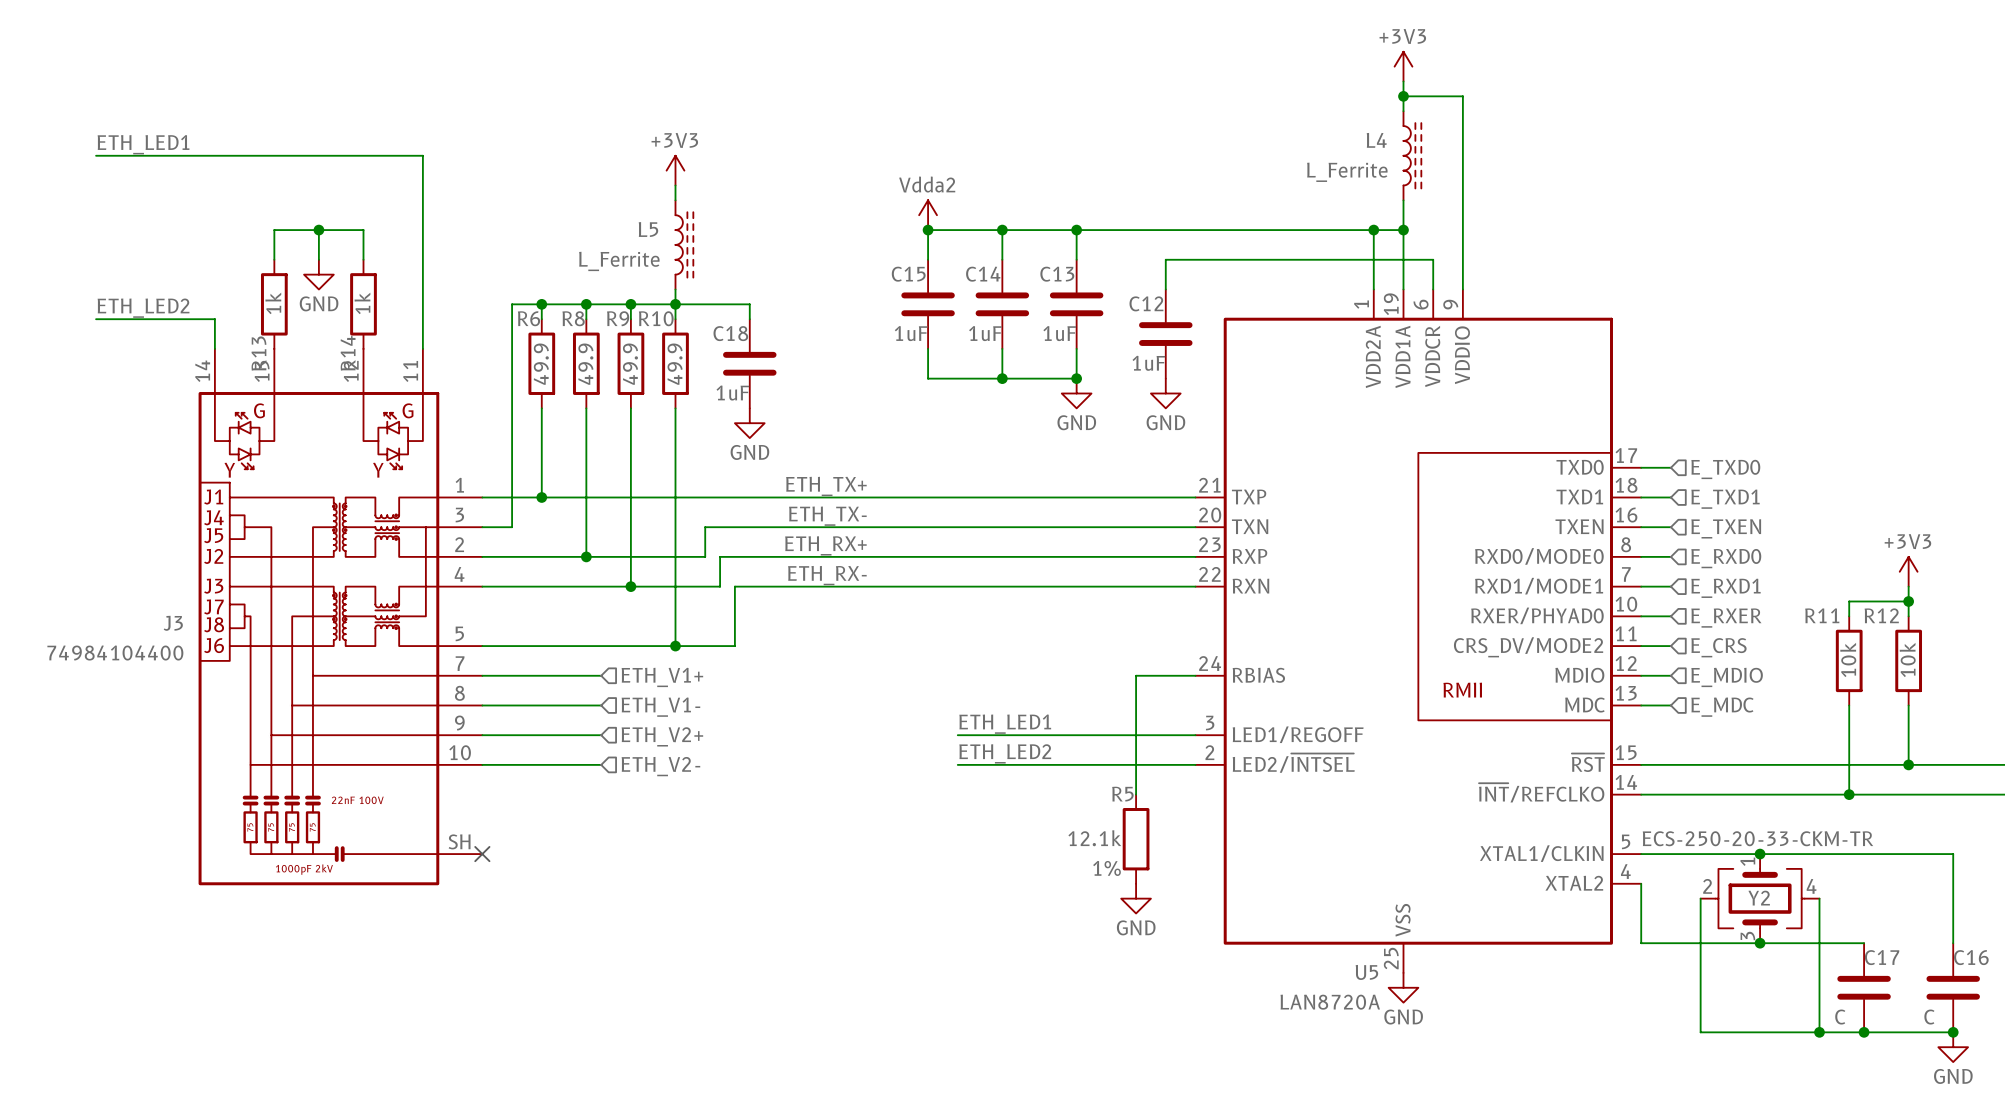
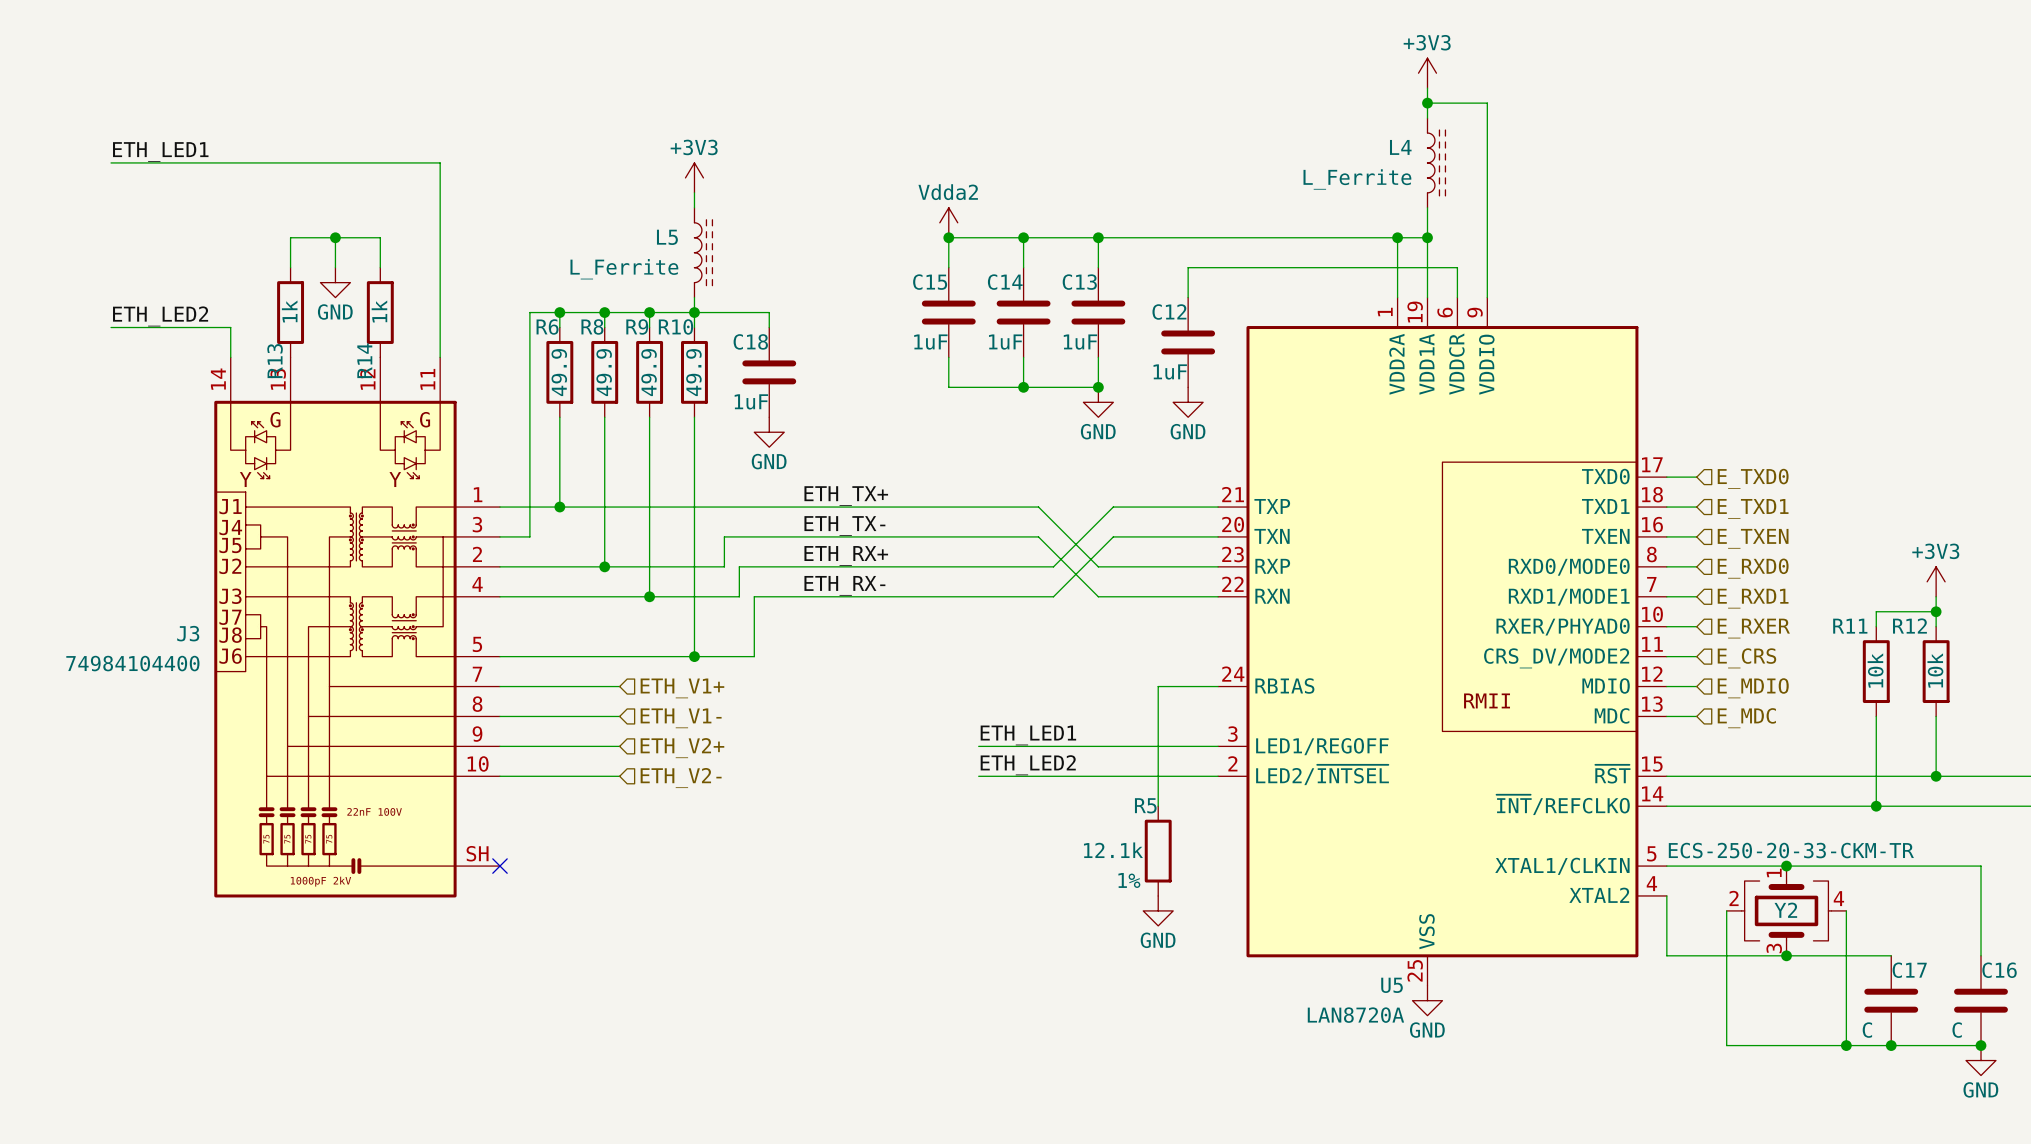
wire: (1017, 497) (1091, 497) -> (1053, 566) (1113, 507)
wire: (1017, 527) (1091, 527) -> (1053, 596) (1113, 536)
wire: (1032, 556) (1076, 556) -> (1038, 507) (1098, 566)
wire: (1032, 586) (1076, 586) -> (1038, 536) (1098, 596)

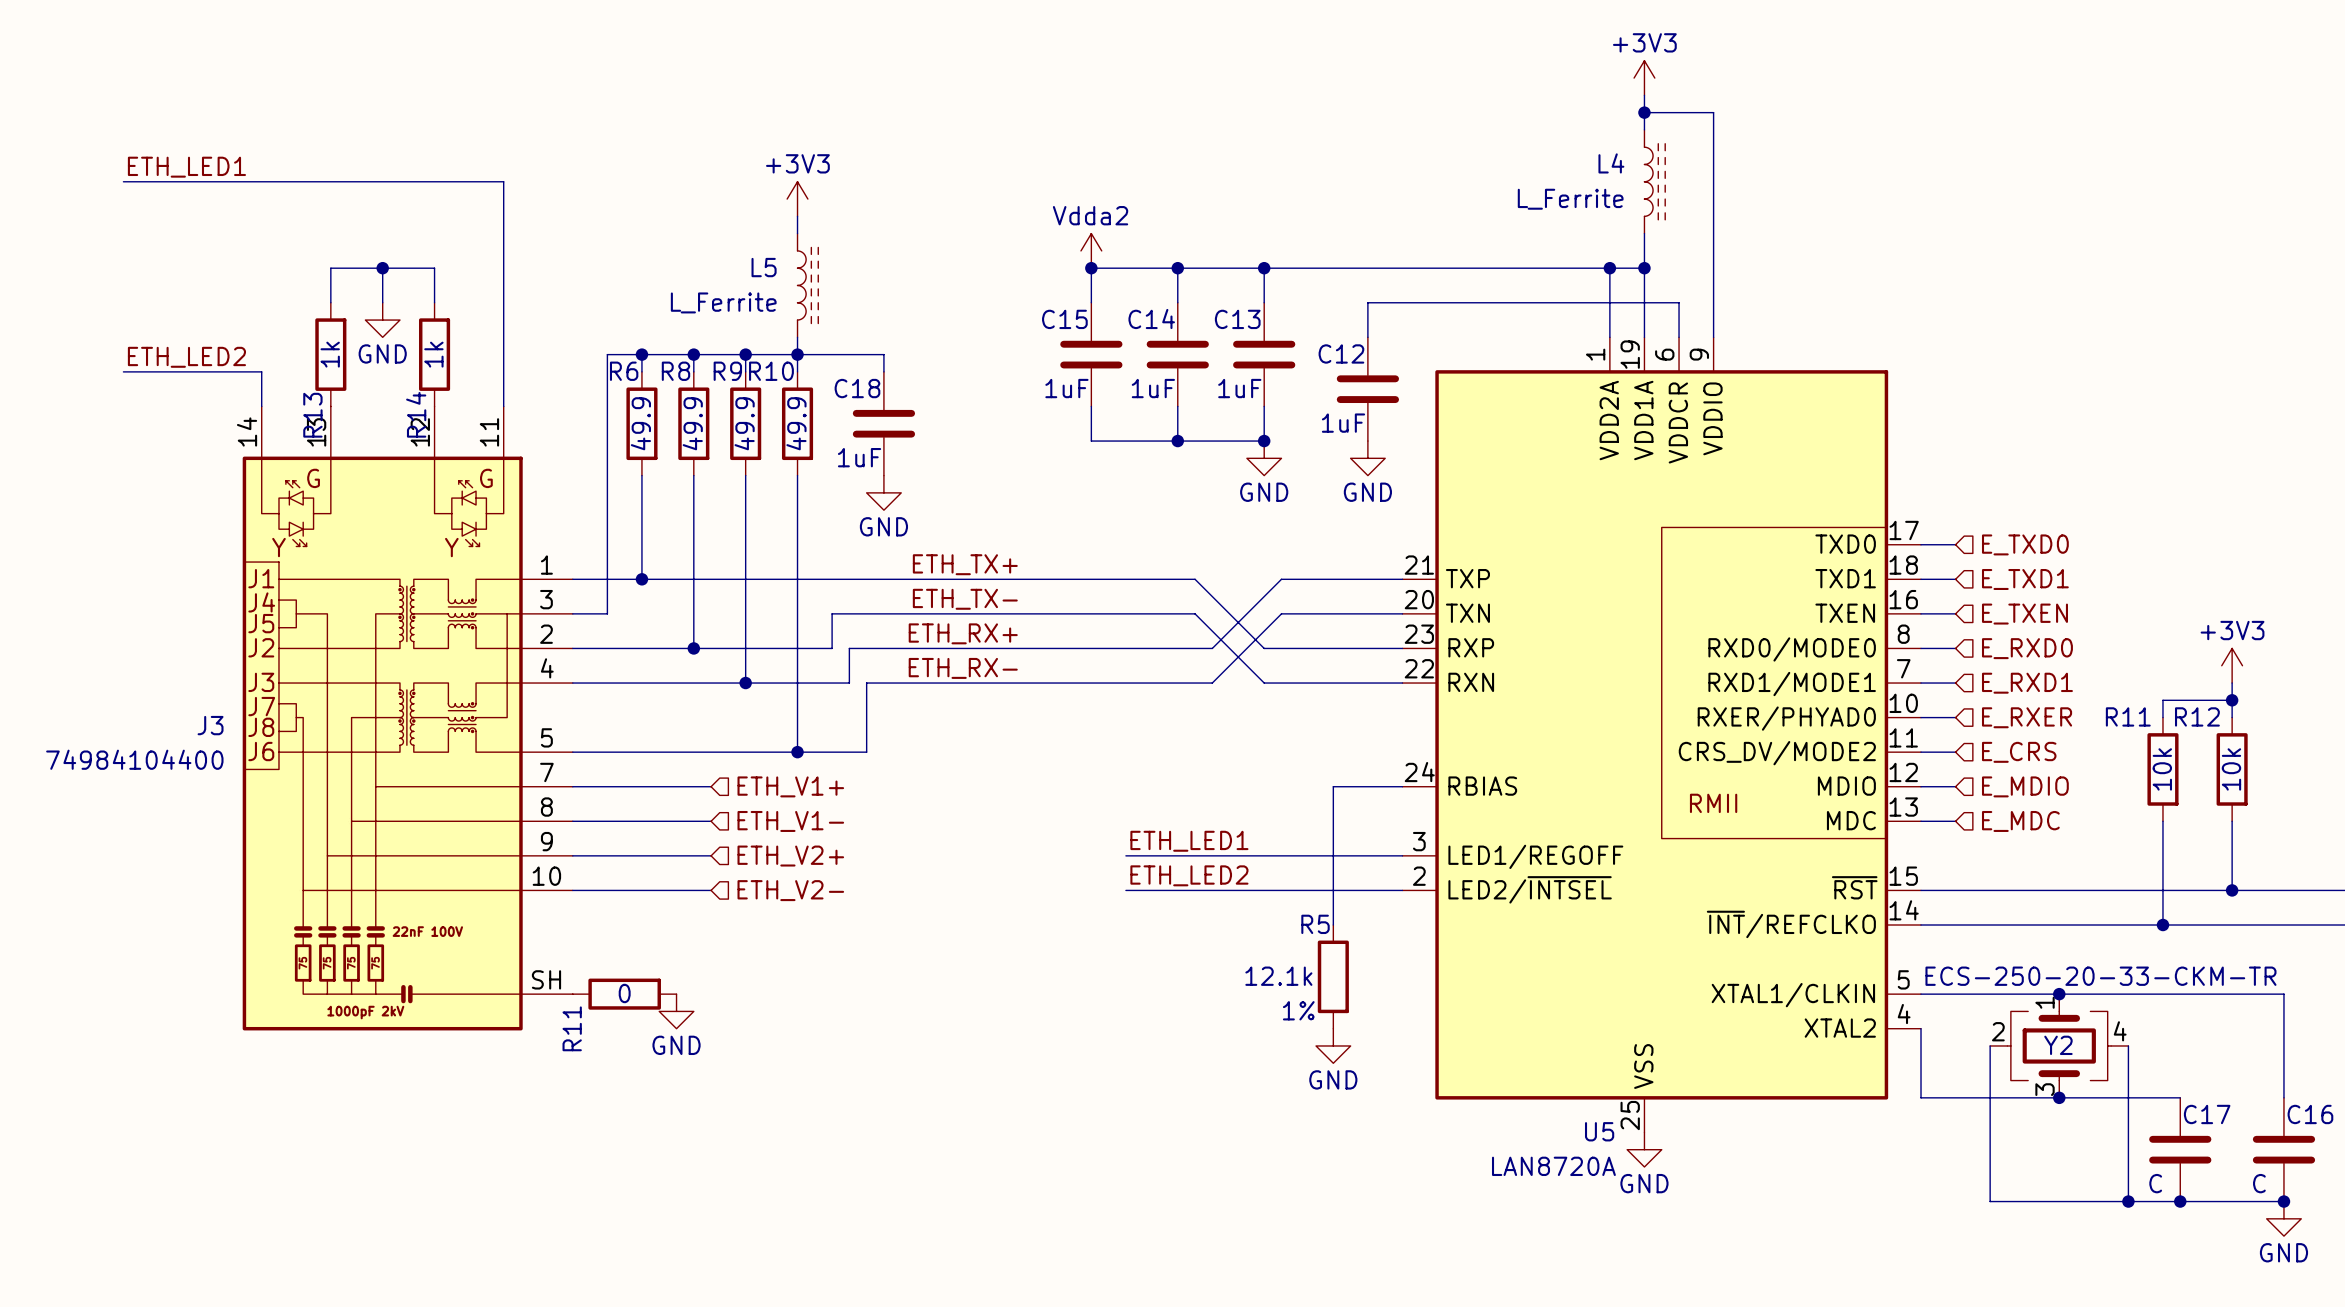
no-connect mark: (499, 866) -> none
R11: none -> 0 (624, 994)
power symbol: none -> GND (676, 1011)

